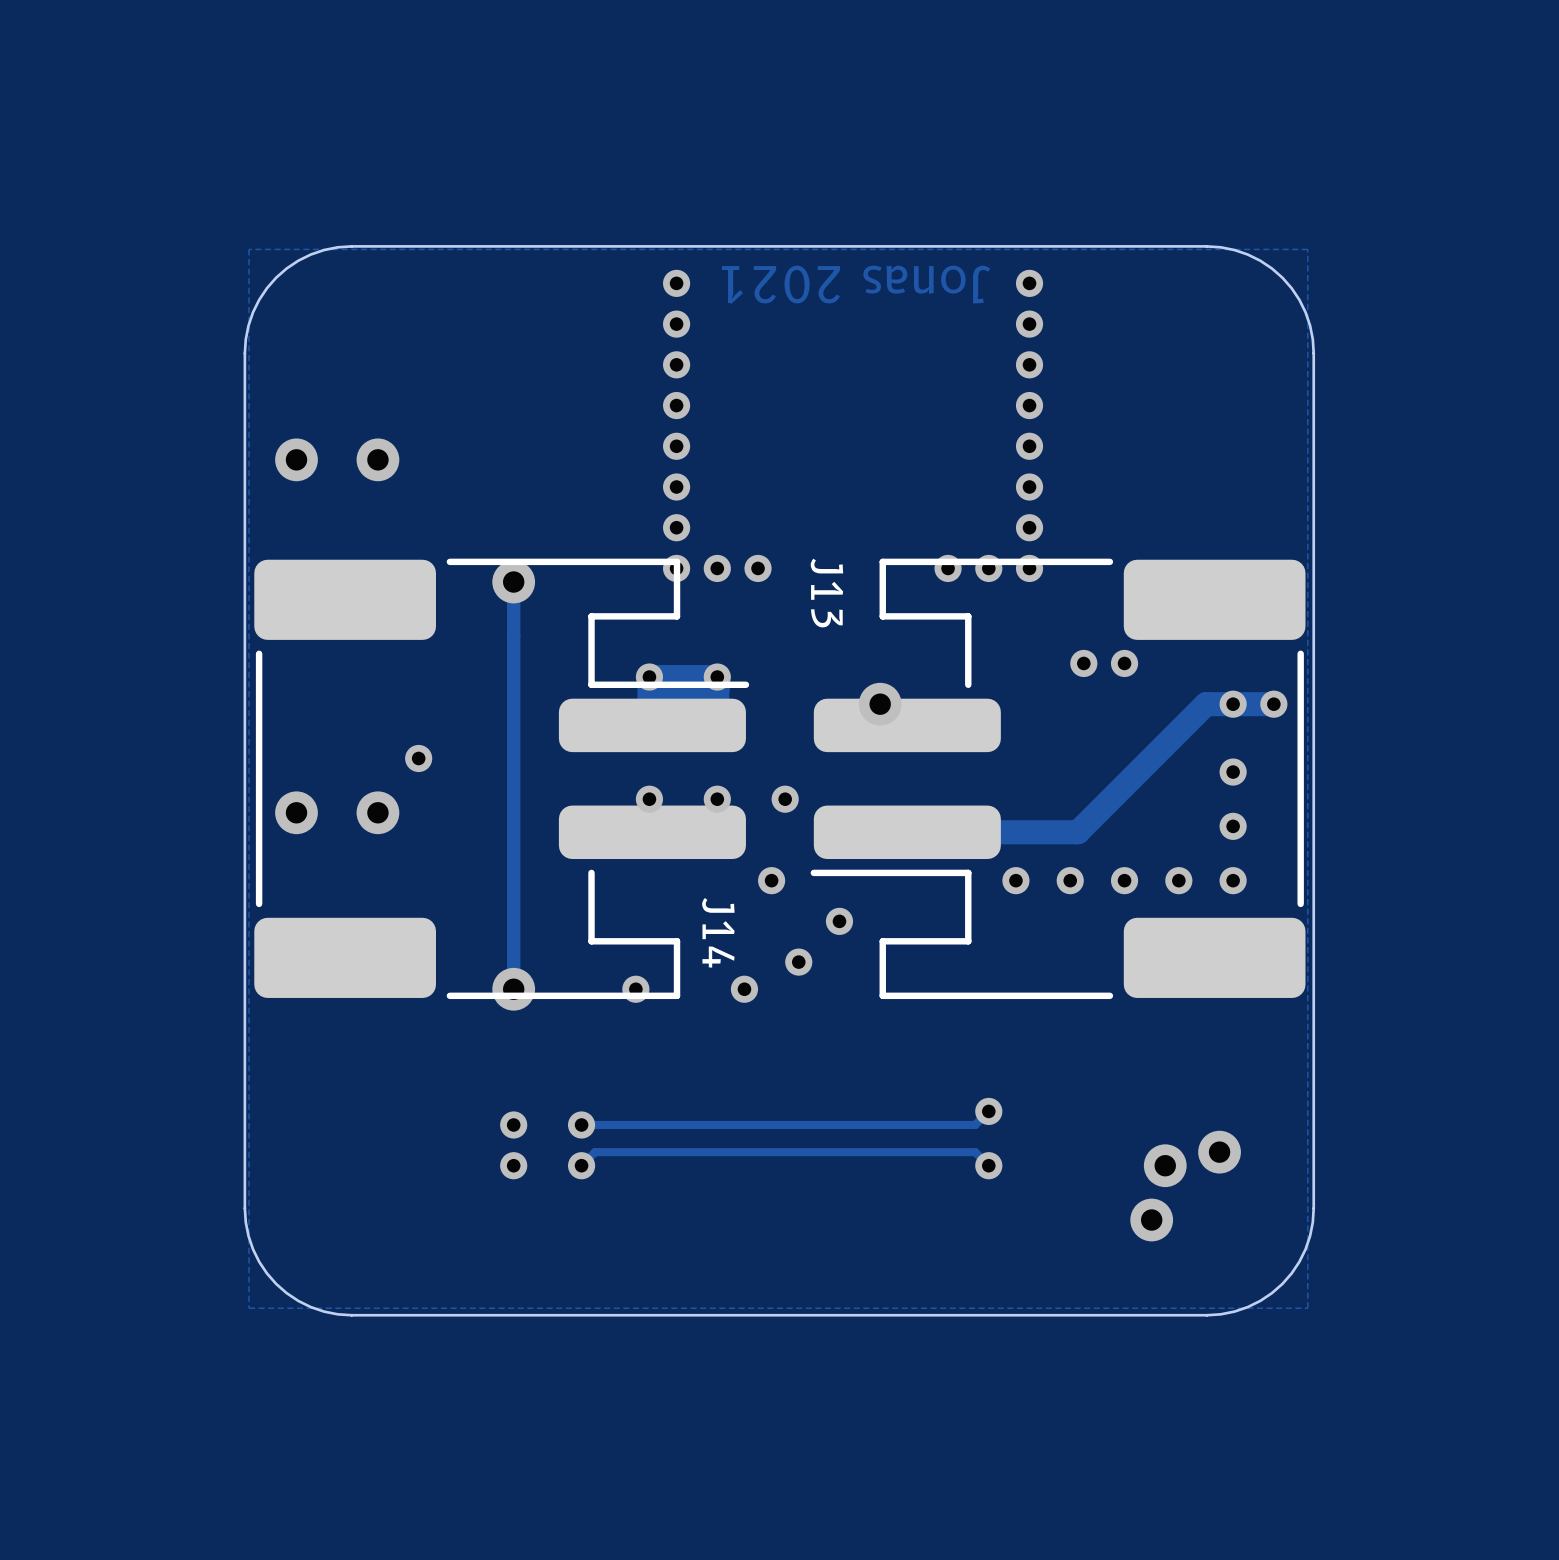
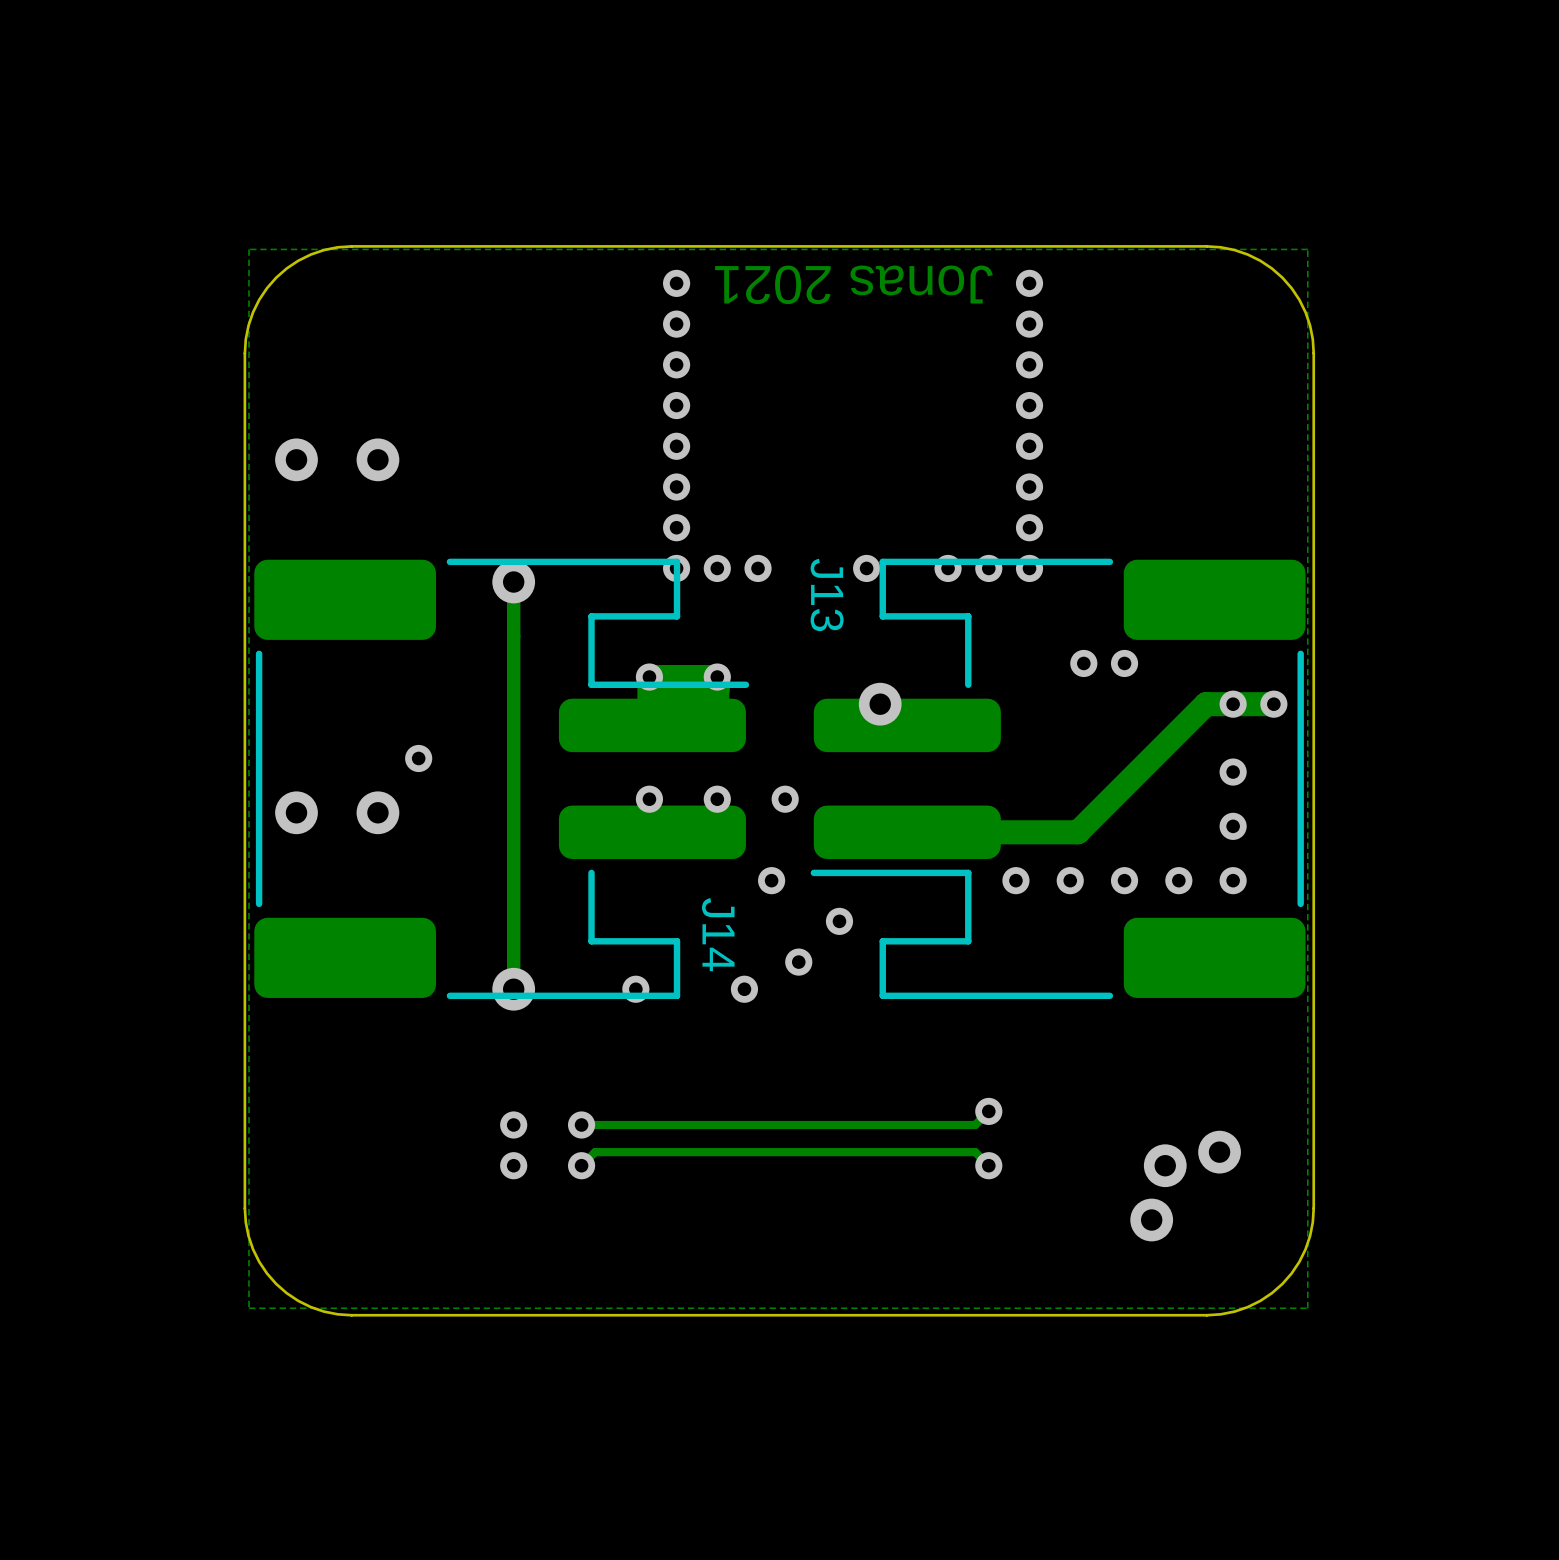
via: none -> (866, 568)

